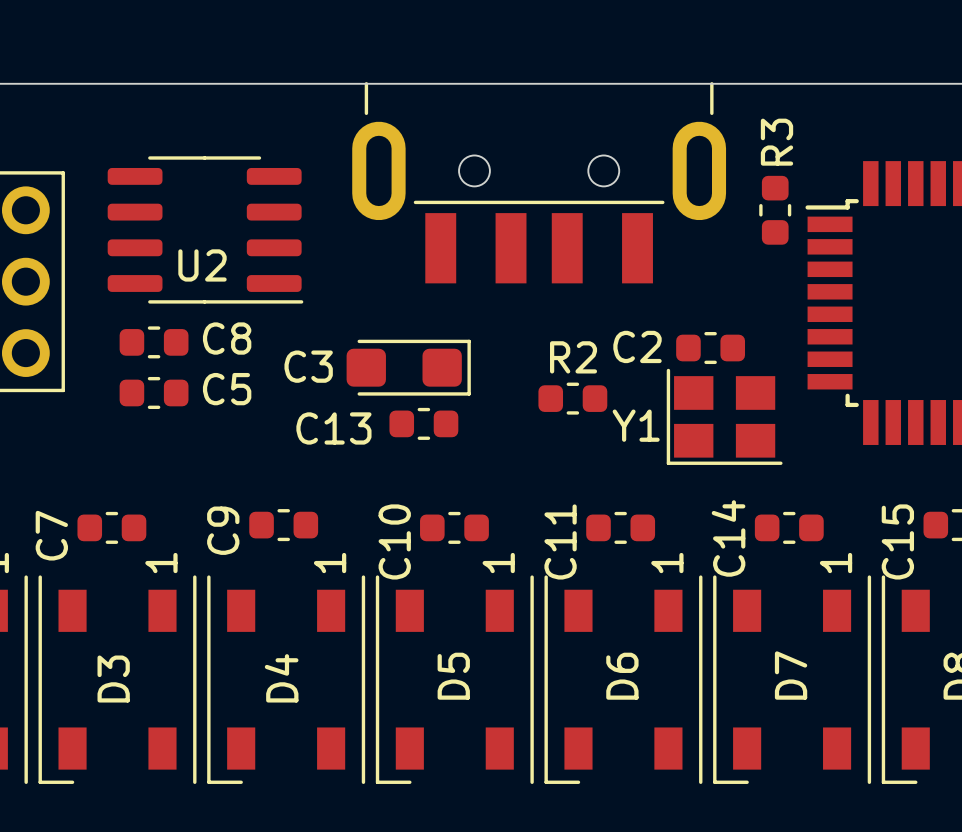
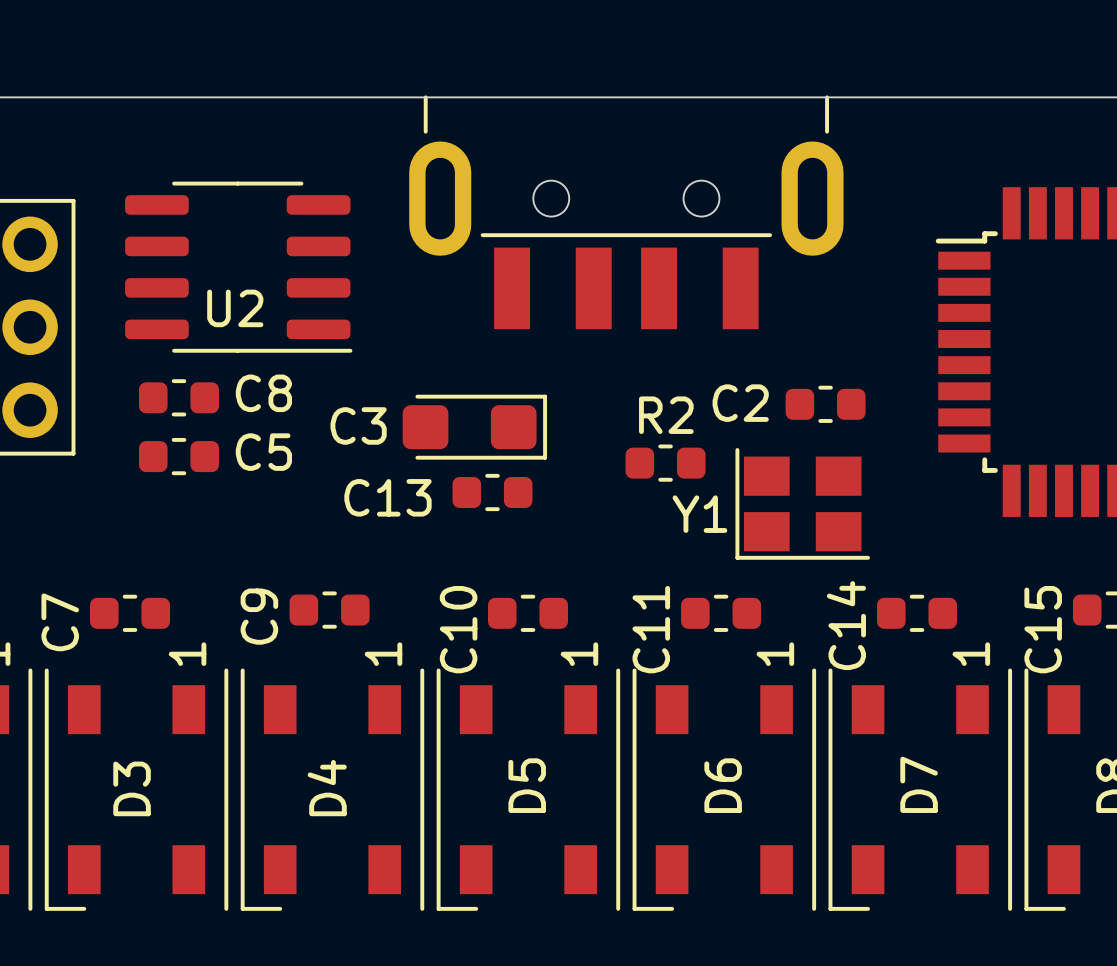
R3: (775, 210) -> none
Y1 position: (724, 416) -> (802, 503)

